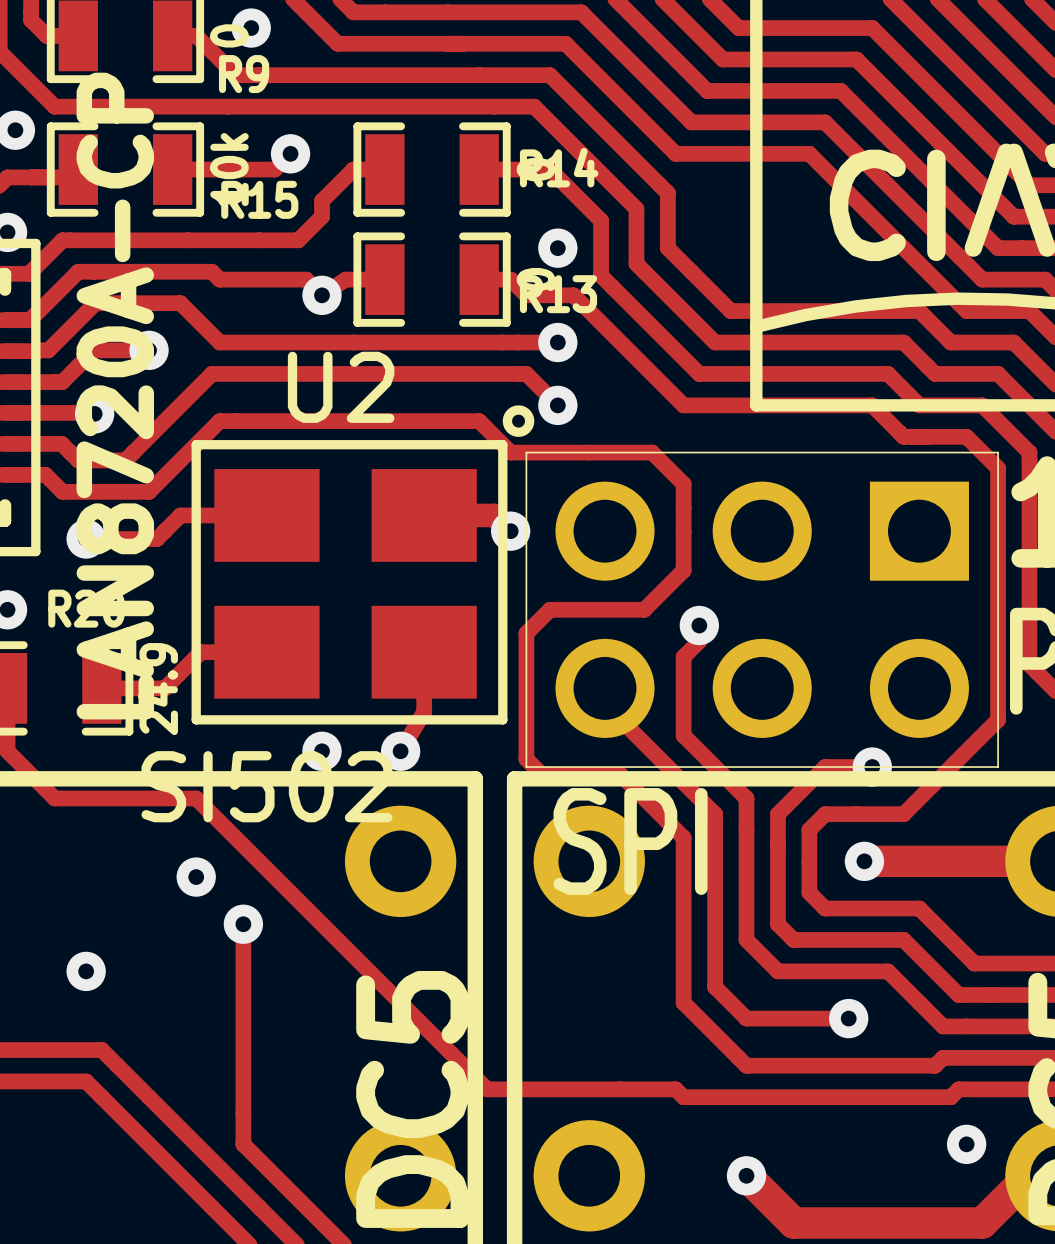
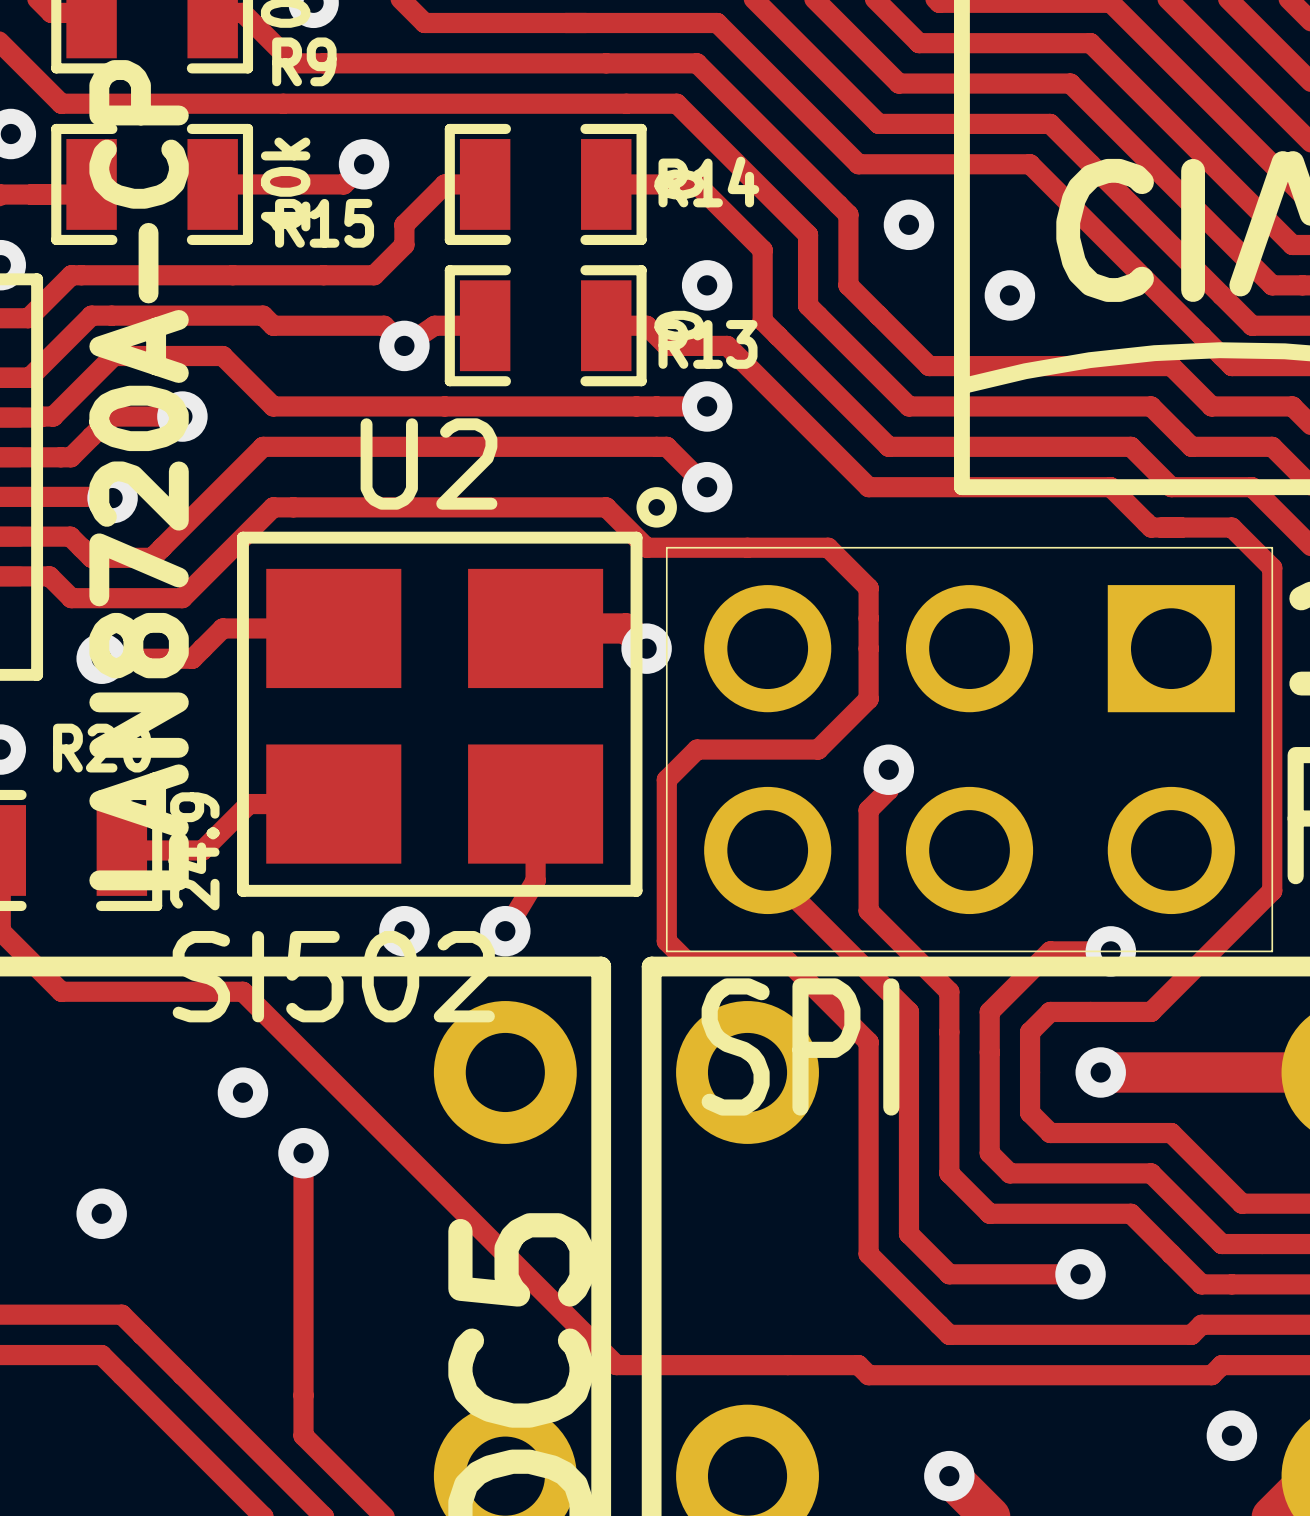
via: none -> (908, 224)
via: none -> (1009, 295)

